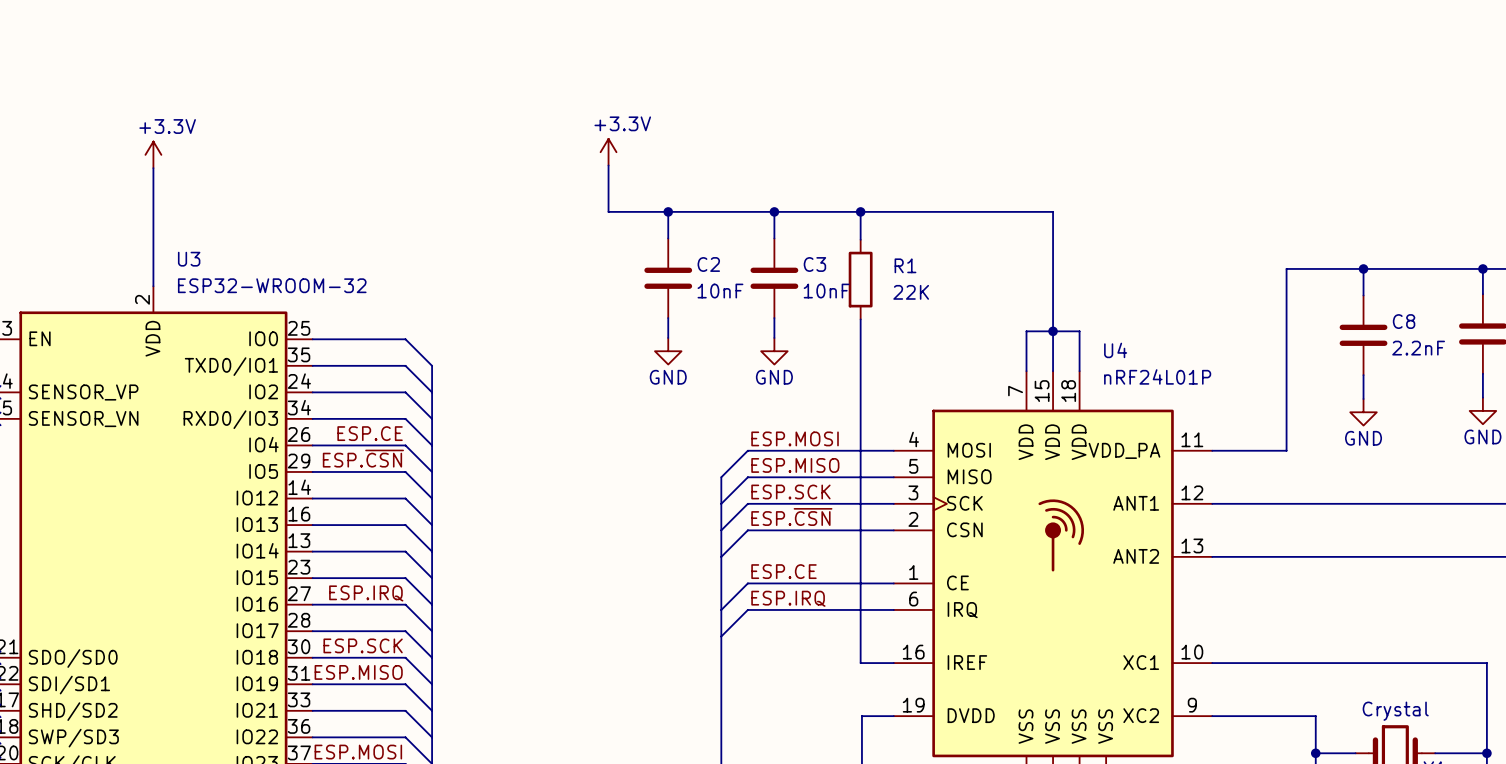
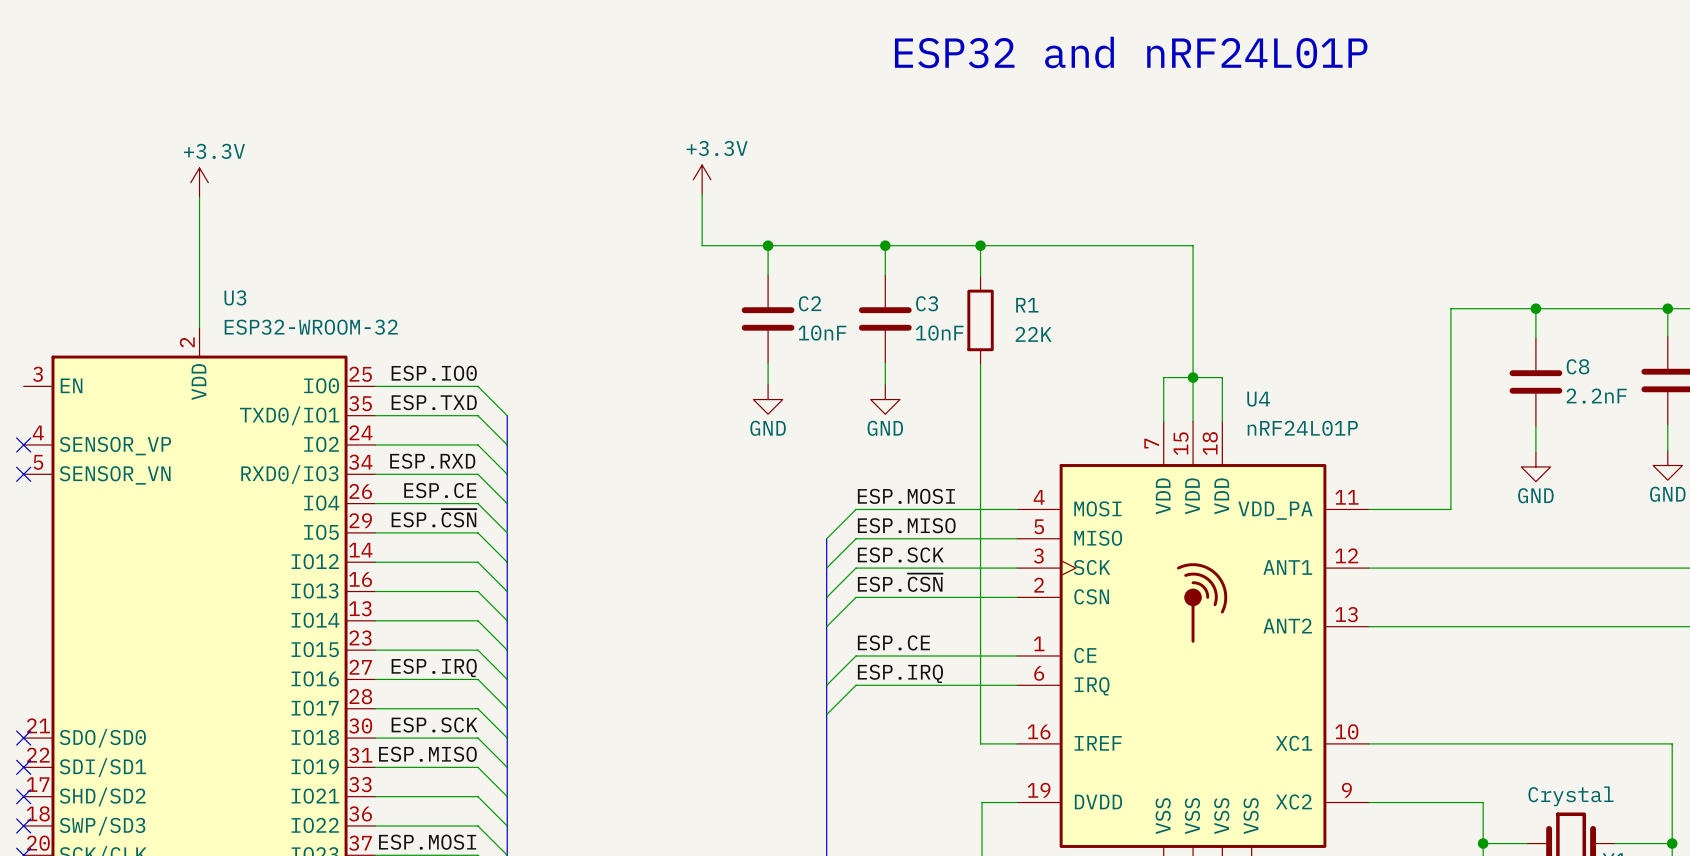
text: none -> ESP32 and nRF24L01P (1131, 52)
label: none -> ESP.IO0 (434, 373)
label: none -> ESP.TXD (434, 402)
label: none -> ESP.RXD (432, 461)

